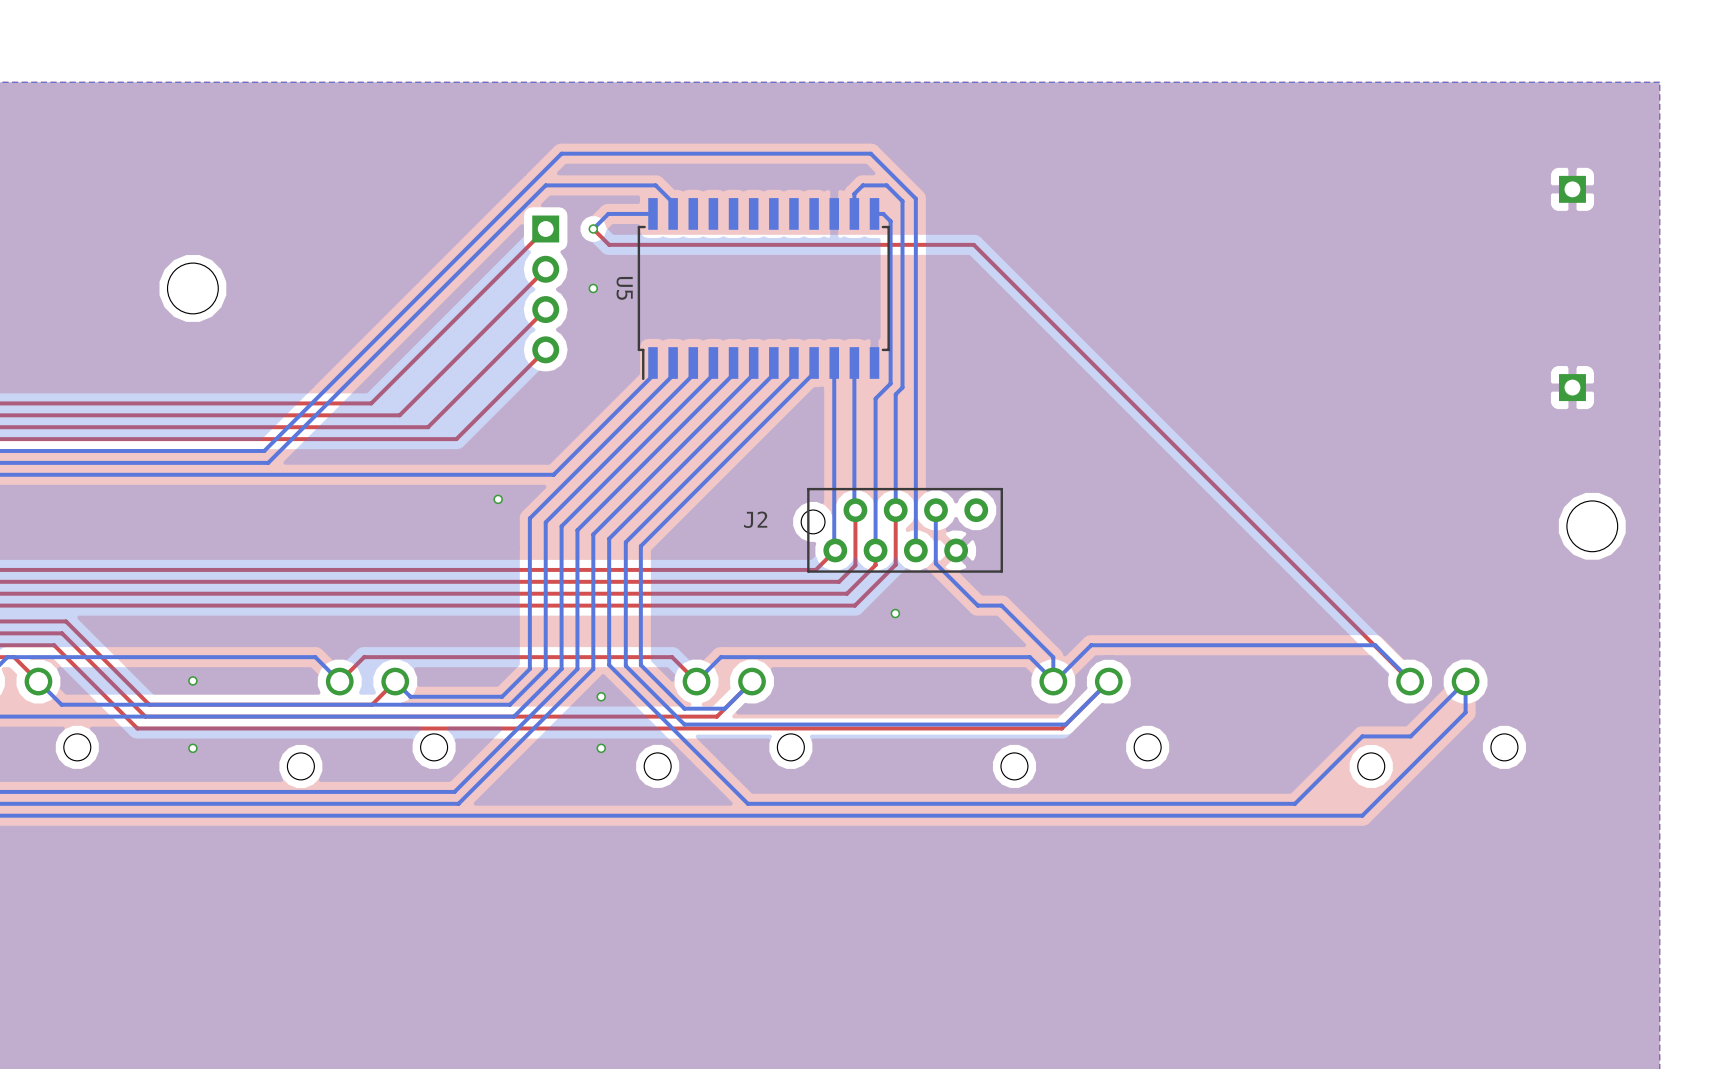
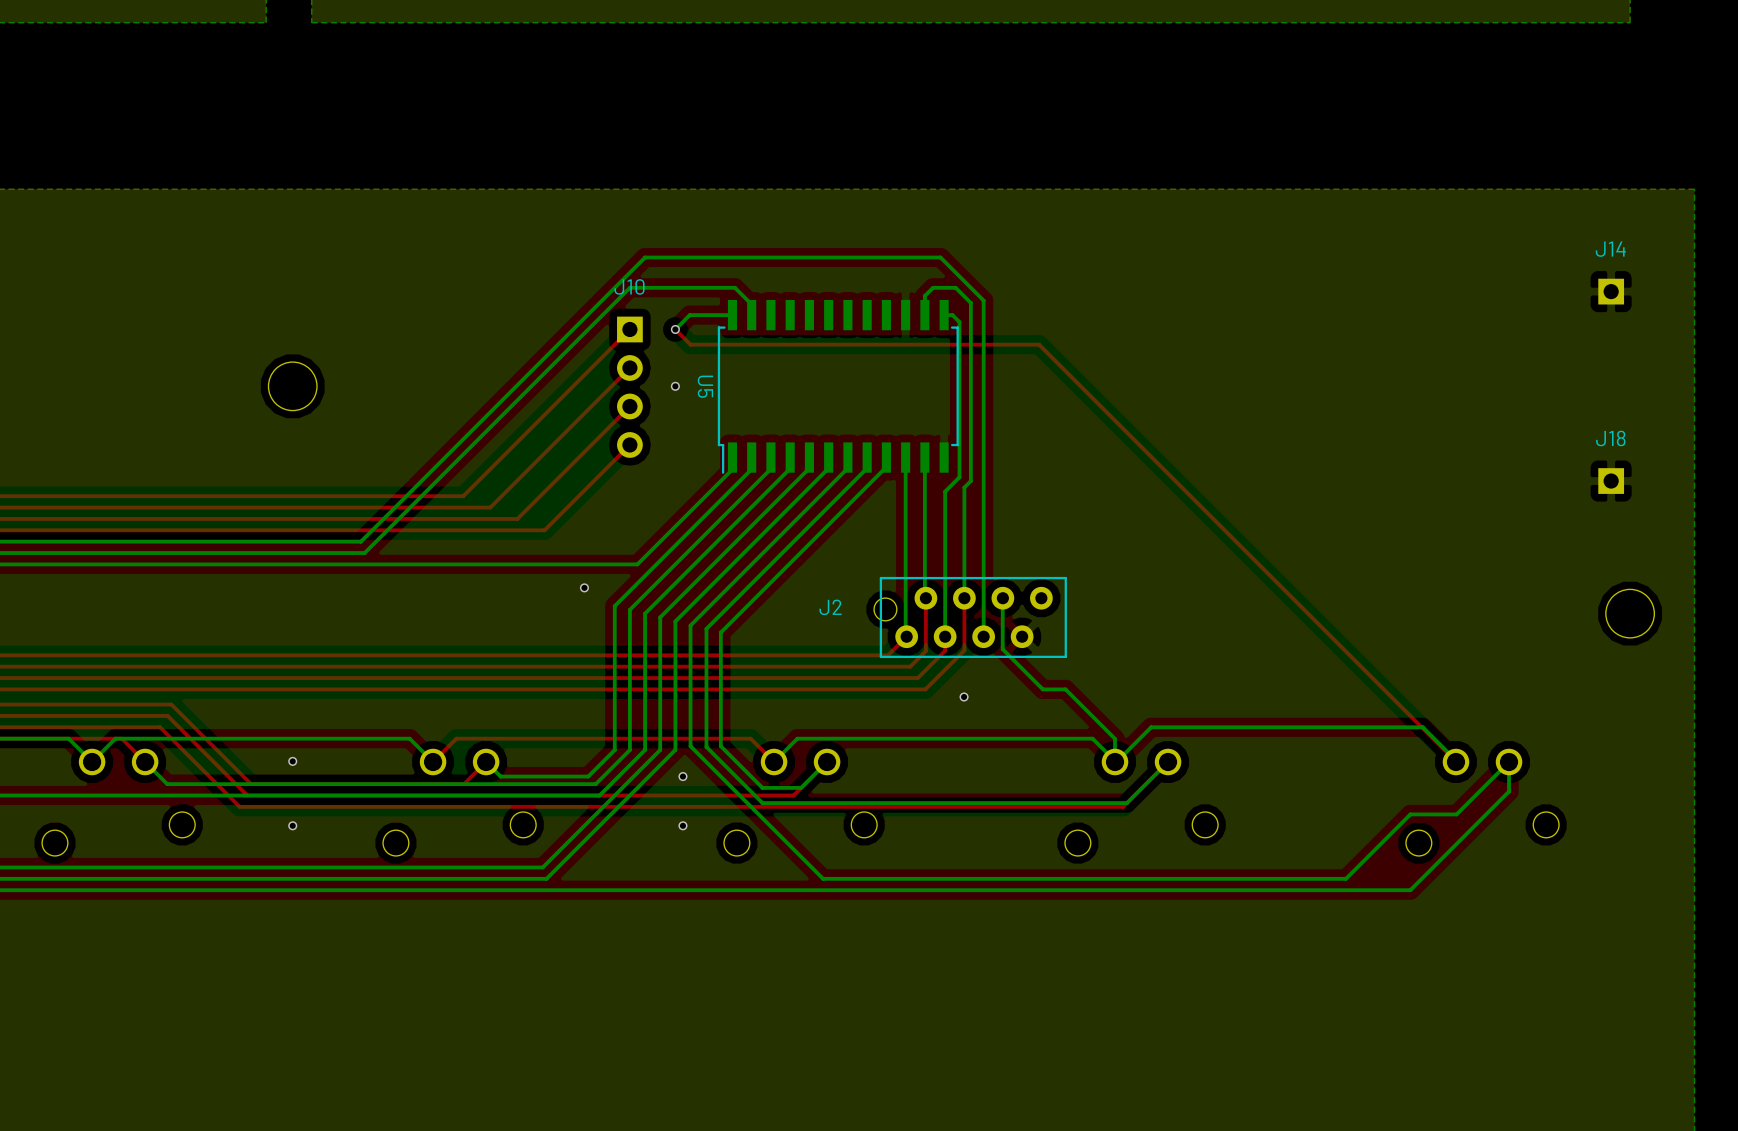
J14 name: none -> J14 (1610, 249)
J10 name: none -> J10 (629, 286)
J18 name: none -> J18 (1610, 438)

